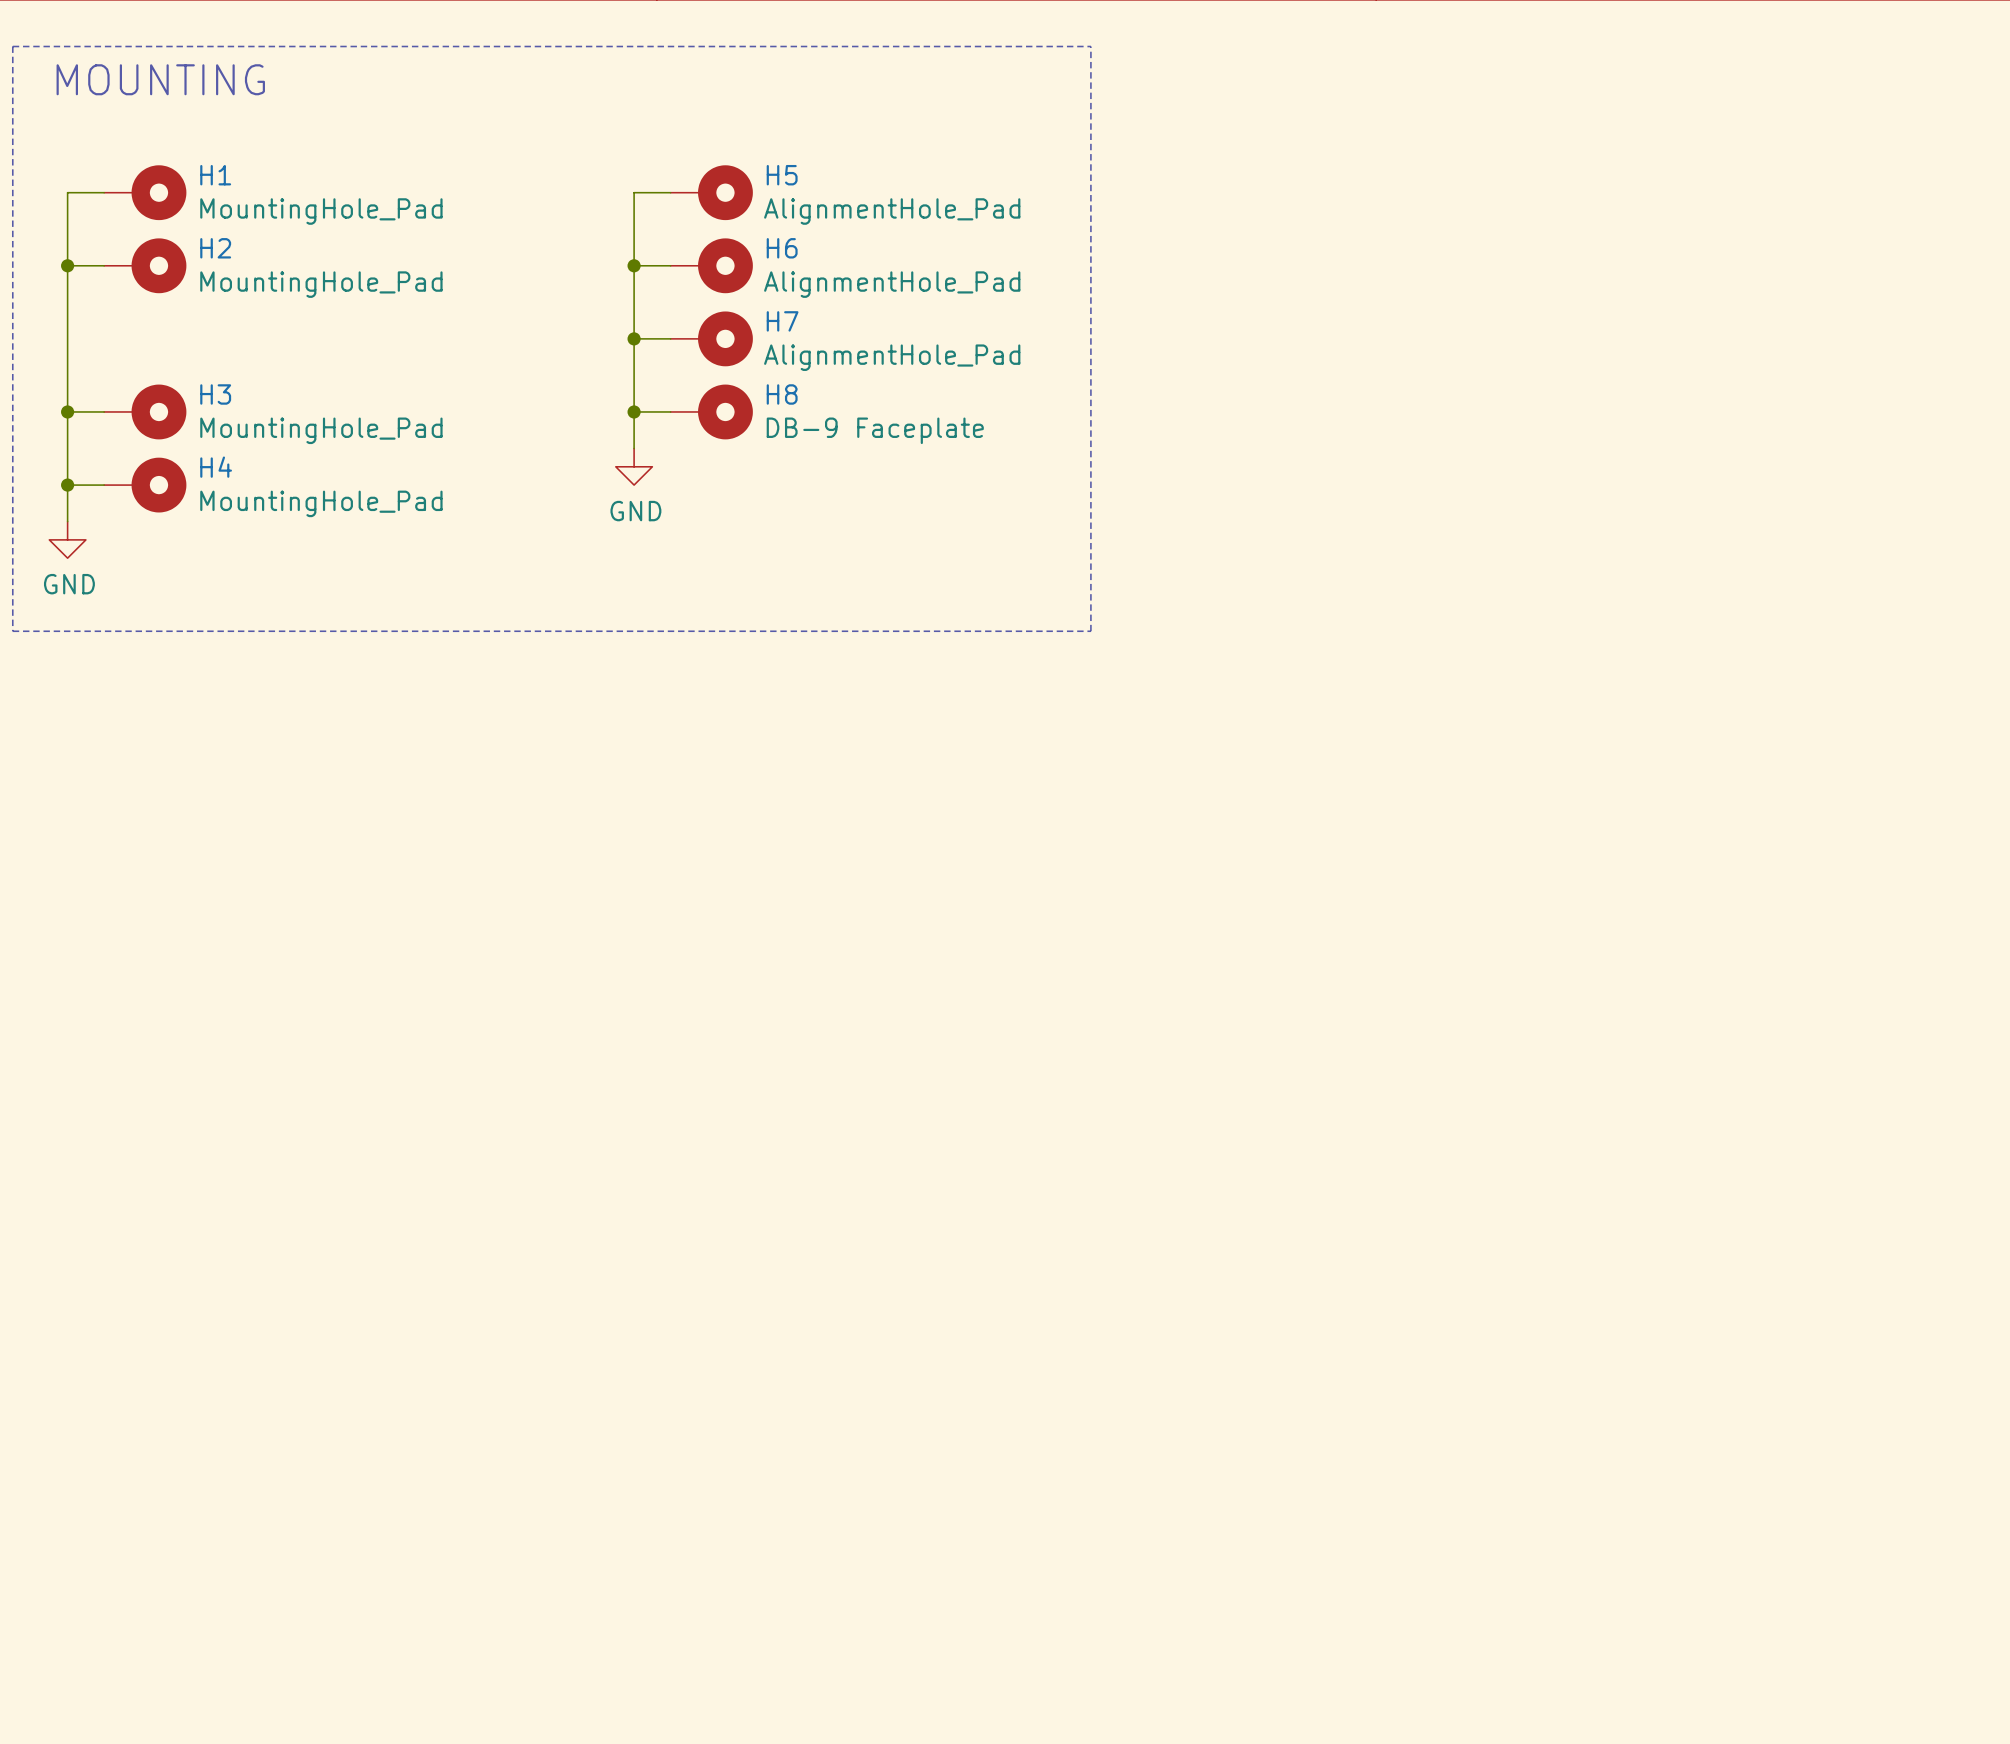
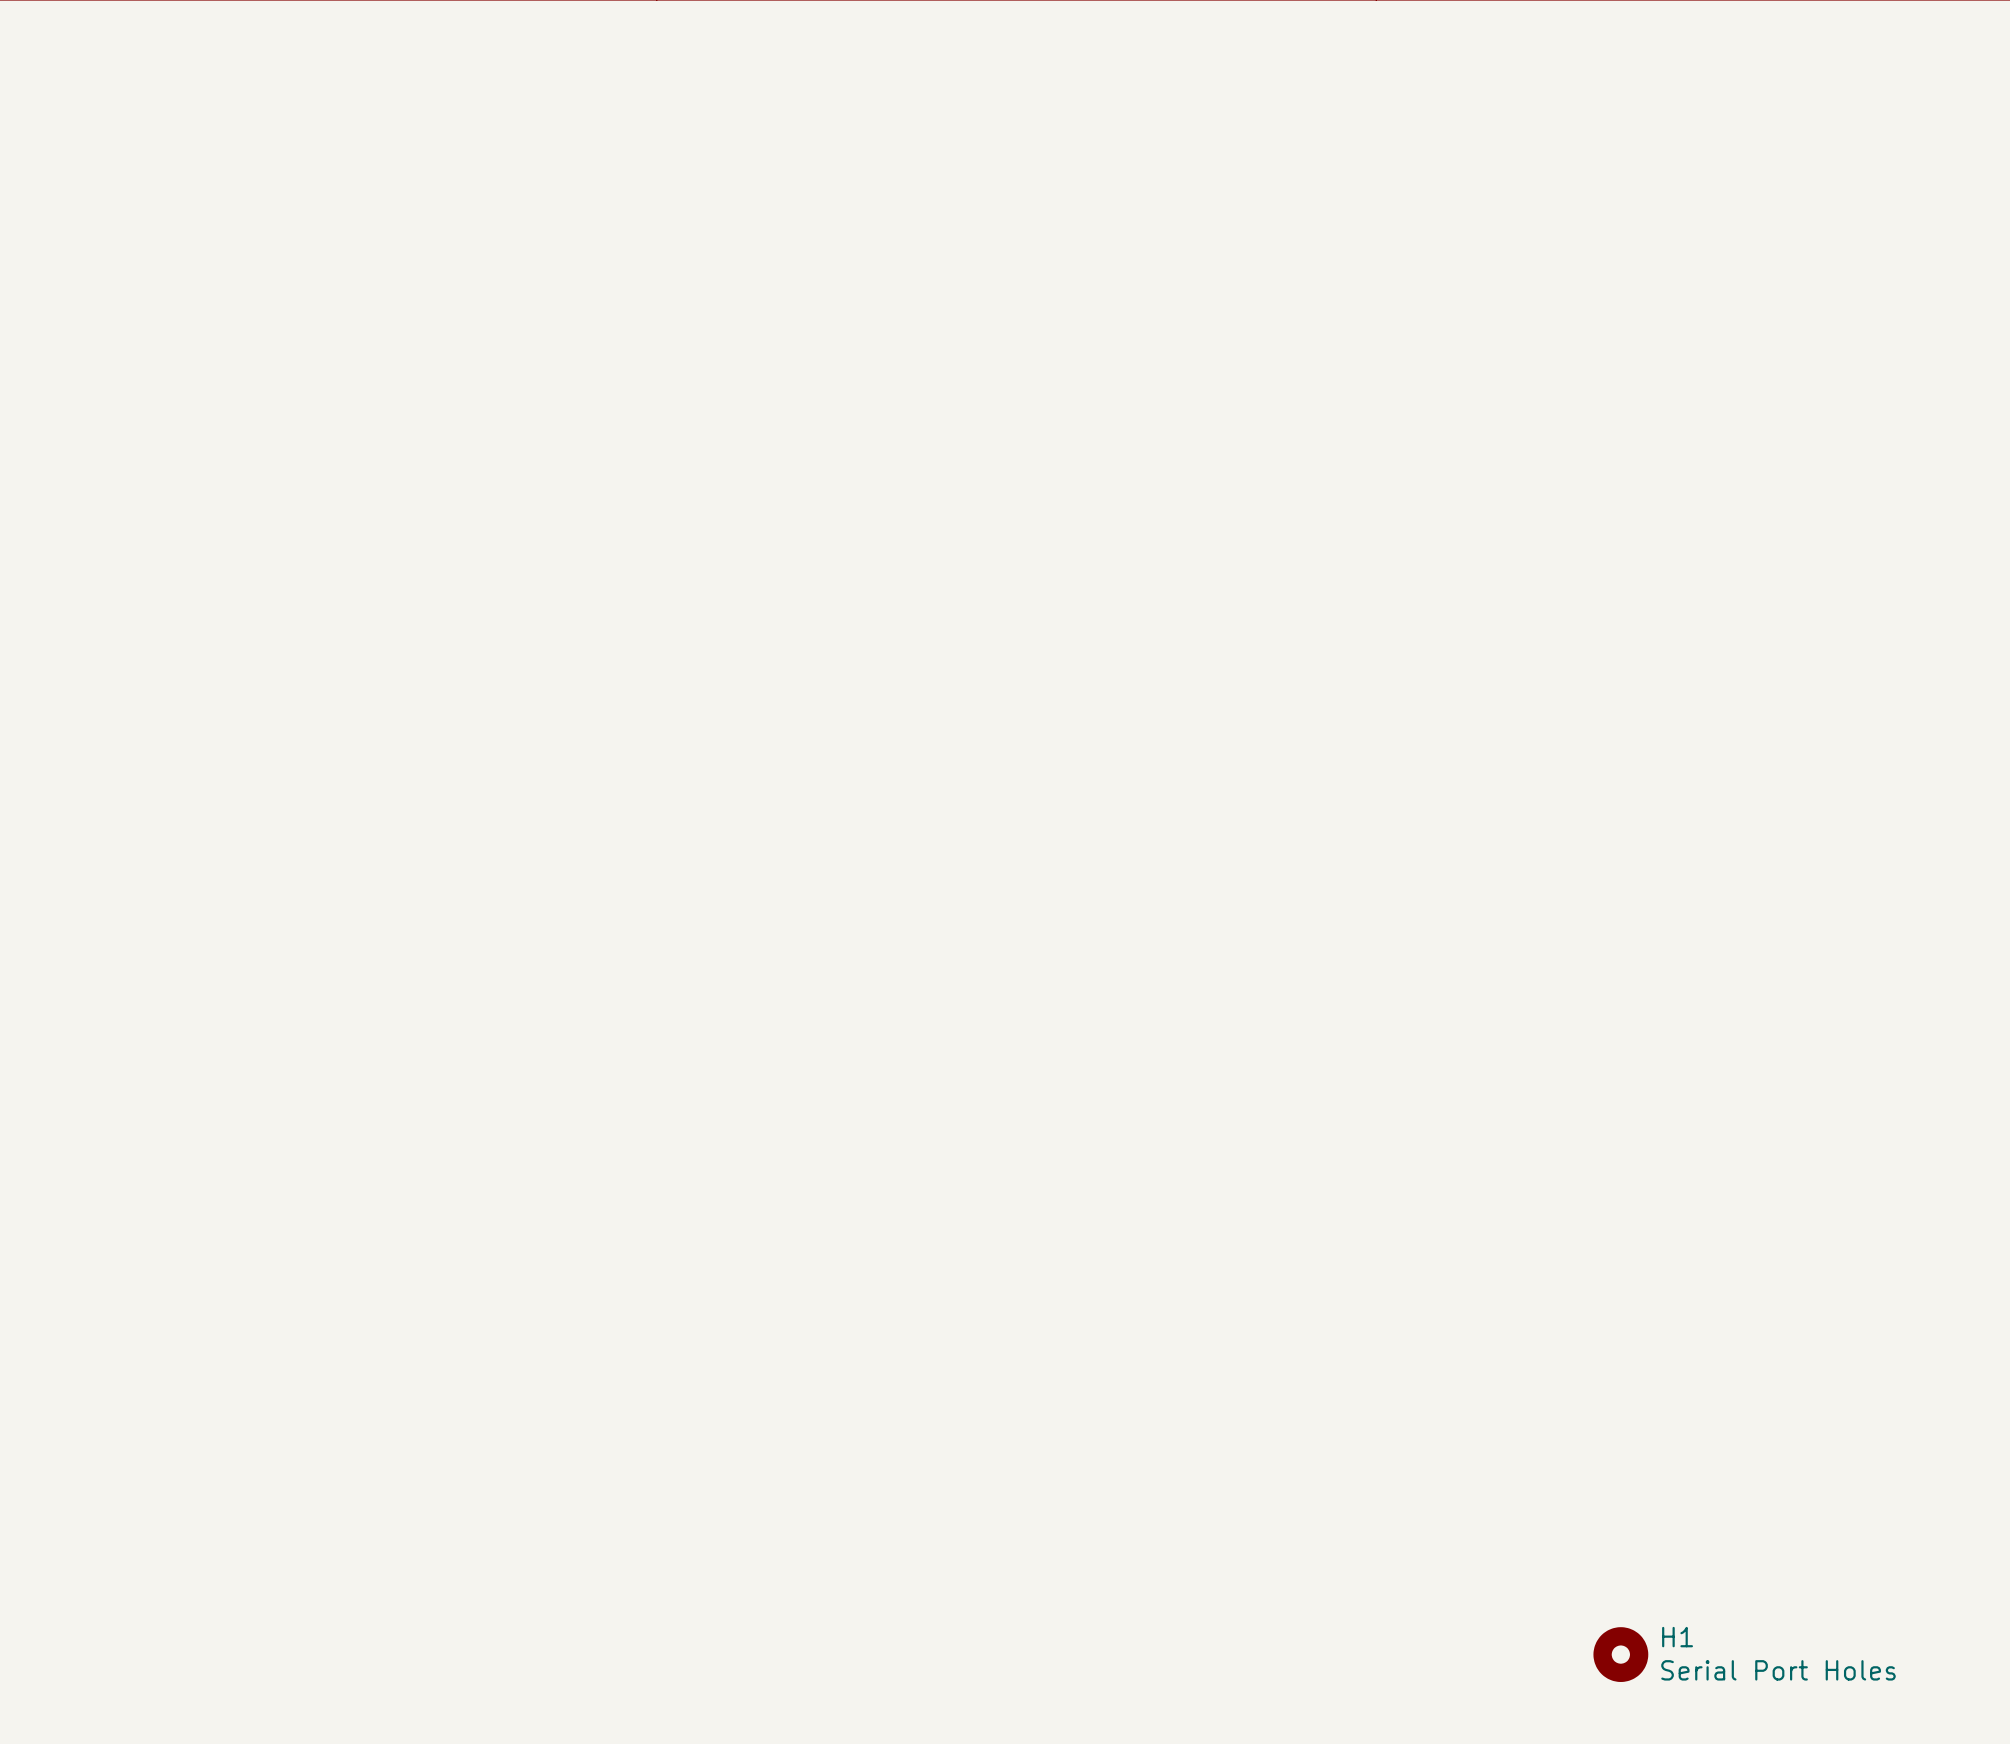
line: (12, 46) (12, 631) (1090, 631) (1090, 46) (12, 46) -> none
text: MOUNTING (160, 79) -> none
H1 symbol: [104, 165, 187, 221] -> [1593, 1627, 1649, 1682]
wire: (104, 192) (67, 192) (67, 521) -> none
wire: (670, 192) (634, 192) (634, 448) -> none
H5: AlignmentHole_Pad (711, 192) -> none
H1 value: MountingHole_Pad (321, 211) -> Serial Port Holes (1778, 1670)
wire: (67, 265) (104, 265) -> none
junction: (67, 265) -> none
H2: MountingHole_Pad (145, 265) -> none
wire: (634, 265) (670, 265) -> none
junction: (634, 265) -> none
H6: AlignmentHole_Pad (711, 265) -> none
wire: (634, 338) (670, 338) -> none
junction: (634, 338) -> none
H7: AlignmentHole_Pad (711, 338) -> none
wire: (67, 411) (104, 411) -> none
junction: (67, 411) -> none
H3: MountingHole_Pad (145, 411) -> none
wire: (634, 411) (670, 411) -> none
junction: (634, 411) -> none
H8: DB-9 Faceplate (711, 411) -> none
power symbol: GND (634, 466) -> none
wire: (67, 485) (104, 485) -> none
junction: (67, 485) -> none
H4: MountingHole_Pad (145, 485) -> none
power symbol: GND (67, 539) -> none

